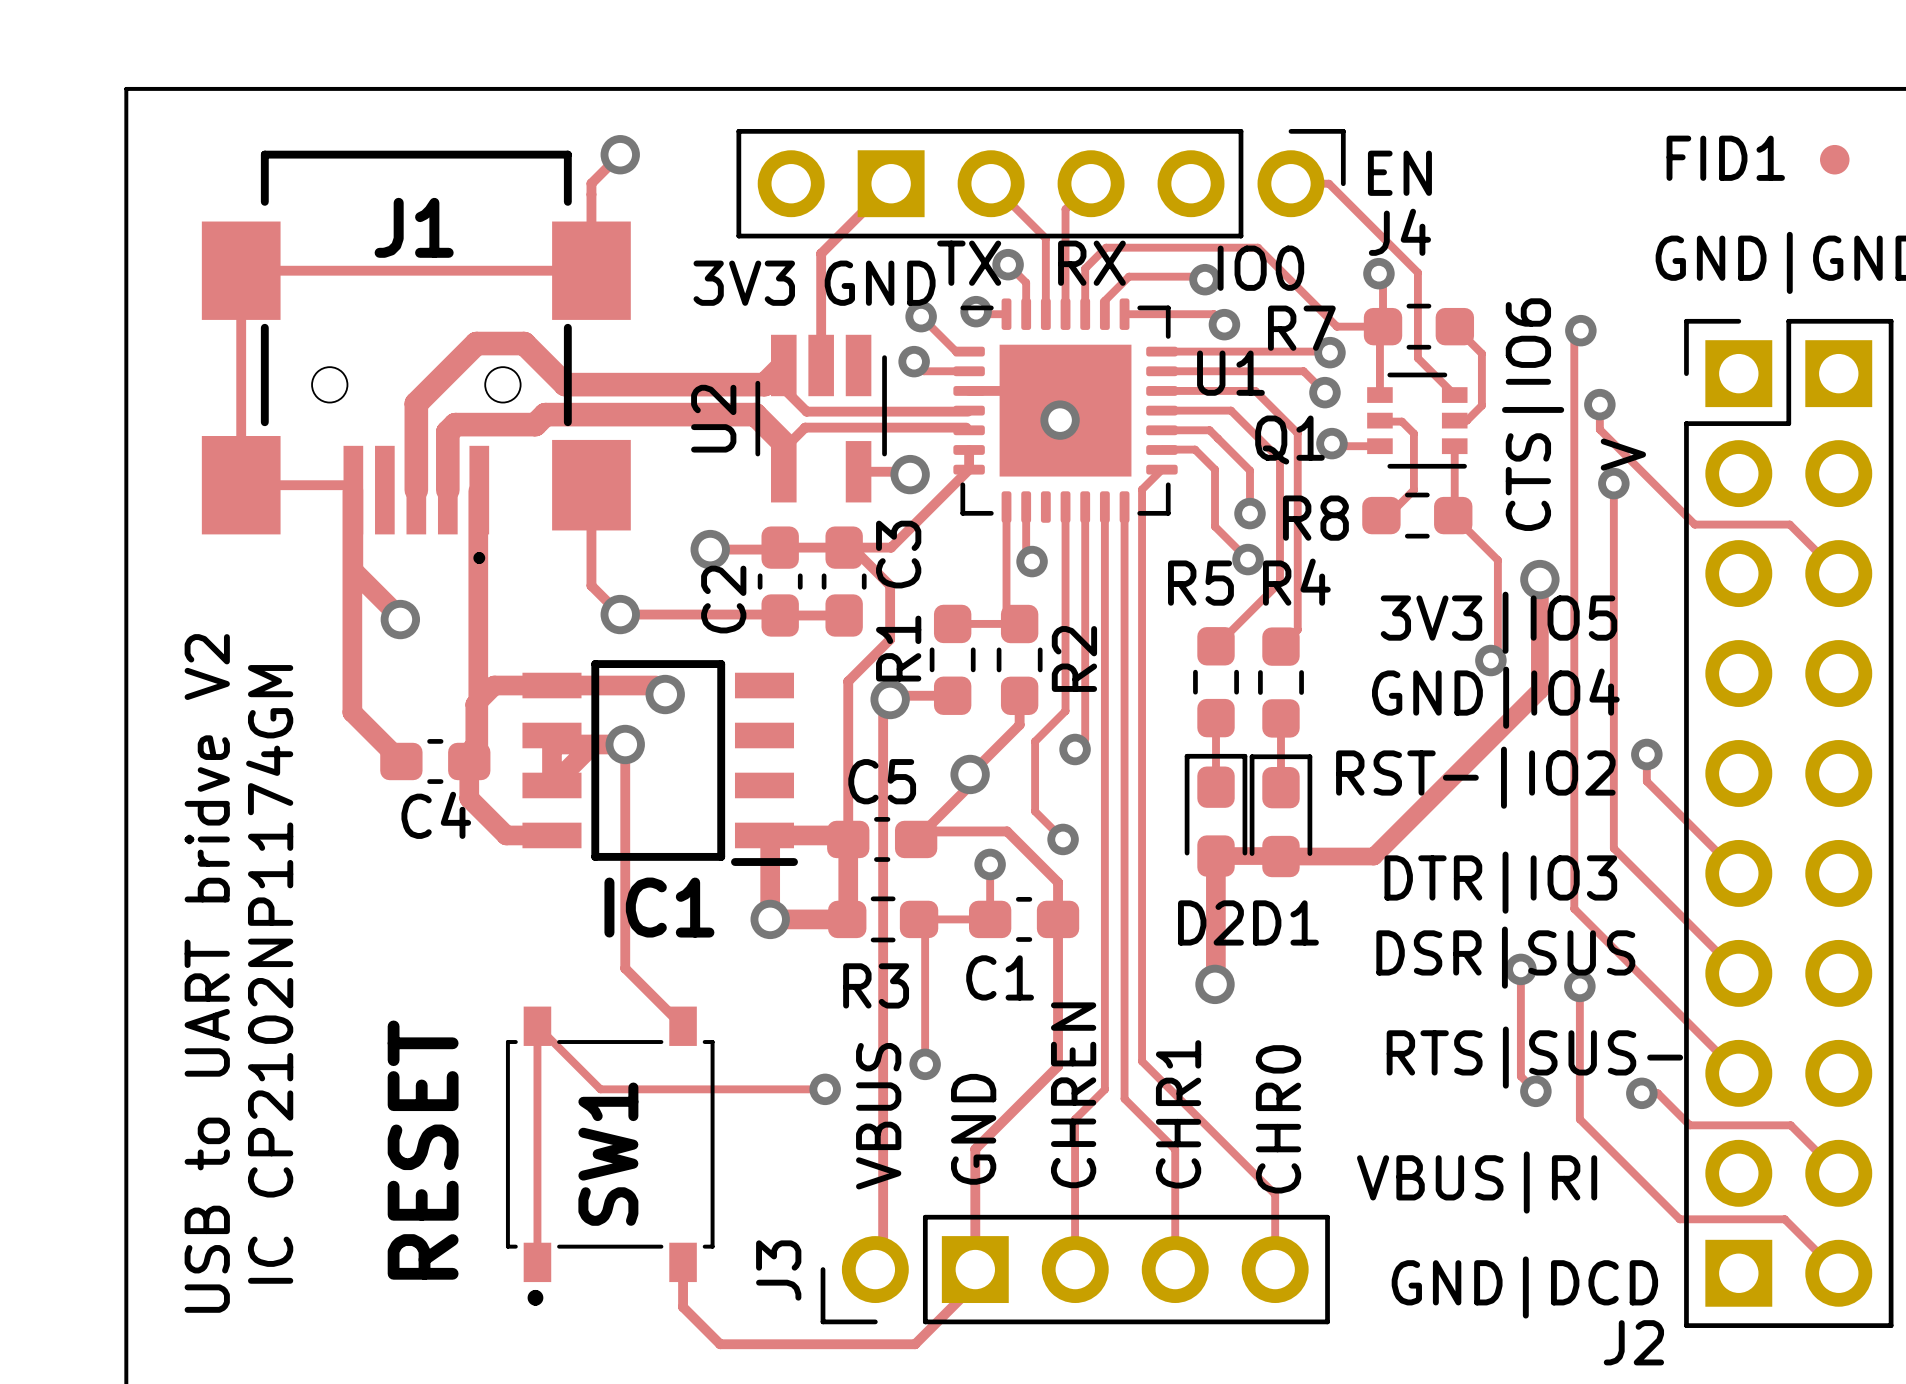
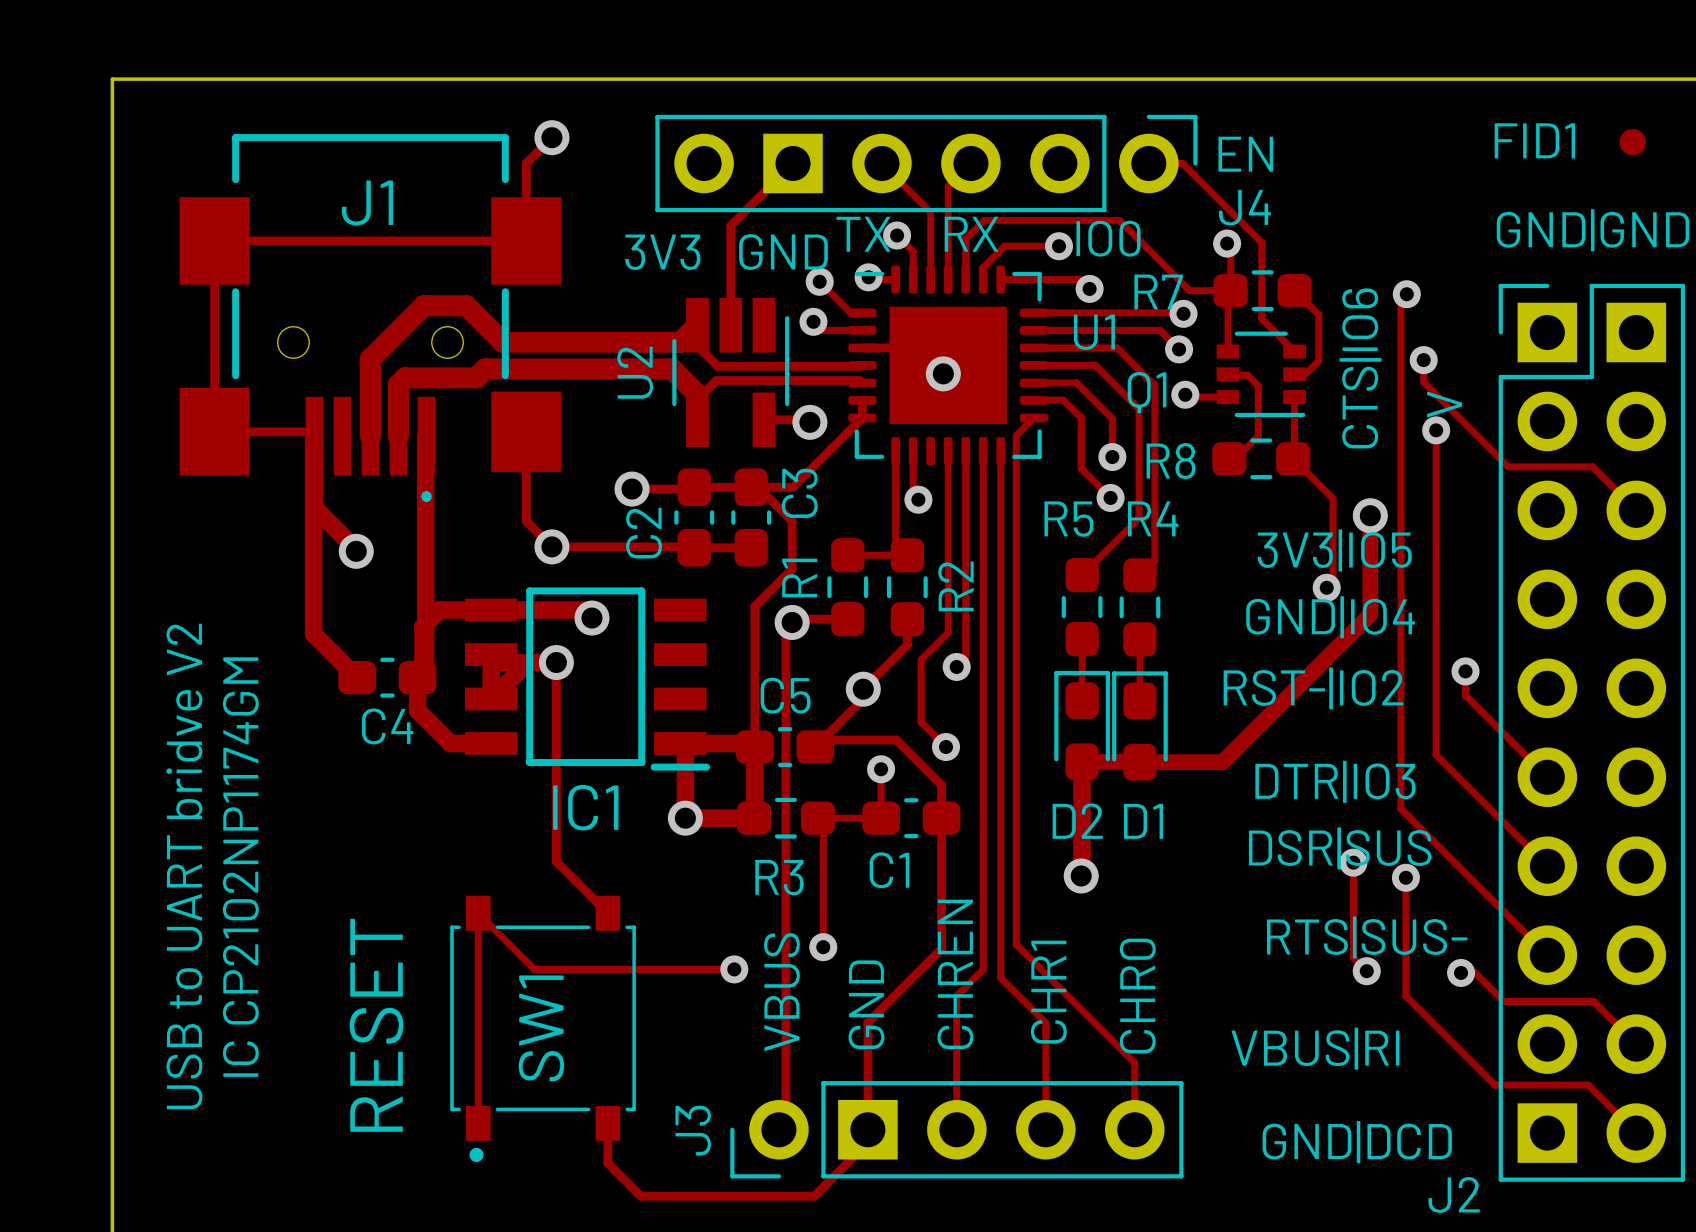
text position: IO0 (1260, 268) -> IO0 (1108, 238)
via position: (1205, 279) -> (1058, 246)

